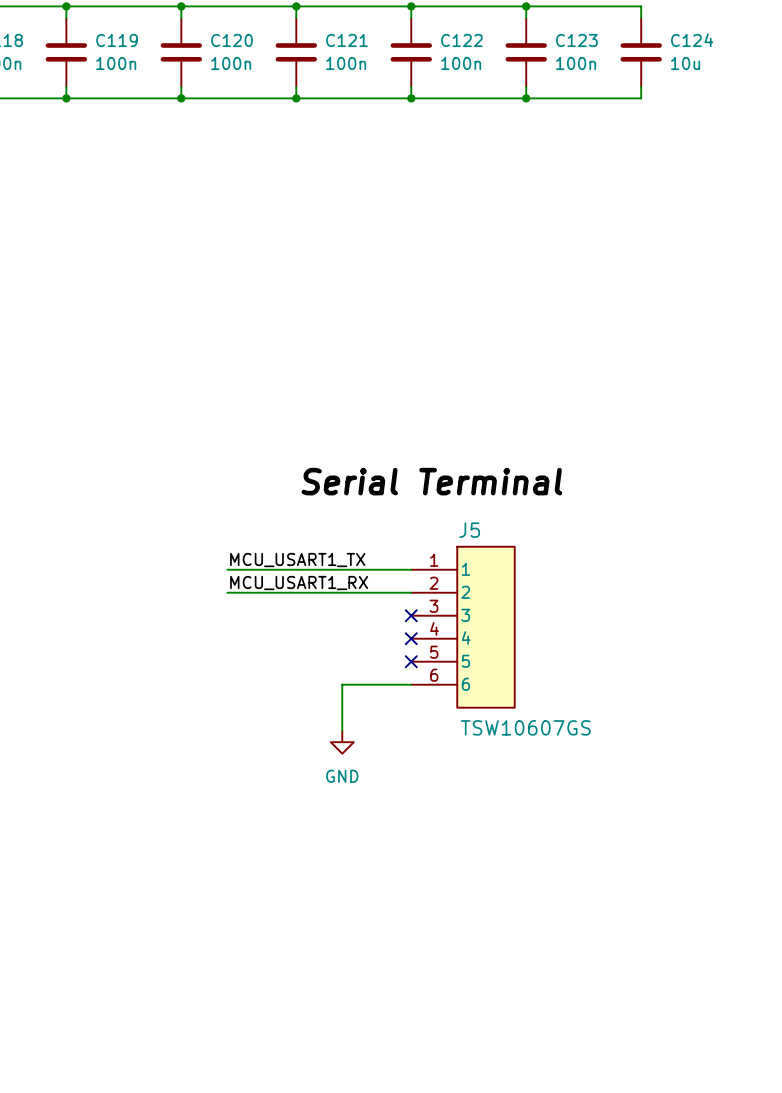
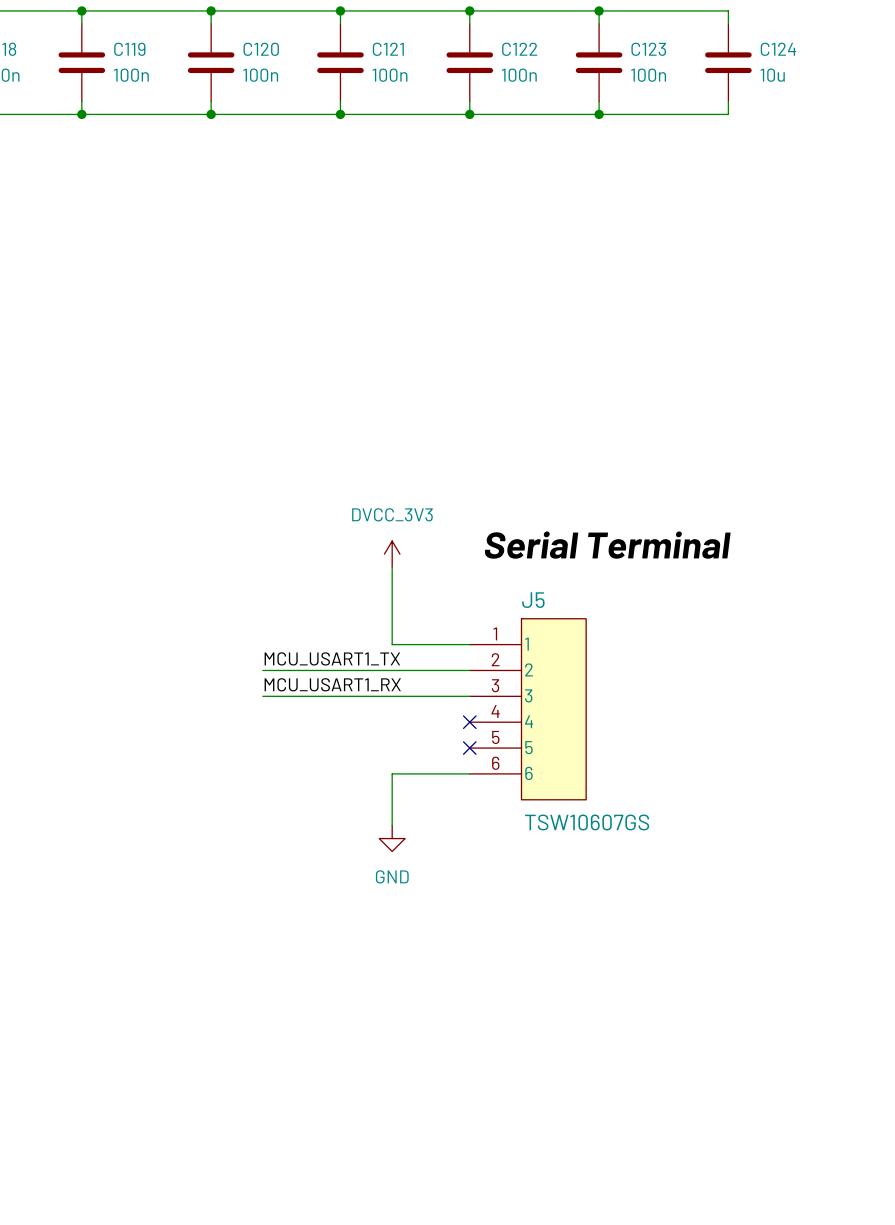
label position: Serial Terminal (431, 481) -> Serial Terminal (607, 545)
power symbol: none -> DVCC_3V3 (392, 554)
label: MCU_USART1_TX (297, 560) -> none
wire: (227, 569) (342, 569) -> (392, 567) (392, 644)
label: MCU_USART1_RX (299, 583) -> MCU_USART1_TX (332, 658)
label: none -> MCU_USART1_RX (332, 684)
wire: none -> (262, 696) (469, 696)
no-connect mark: (411, 615) -> none

